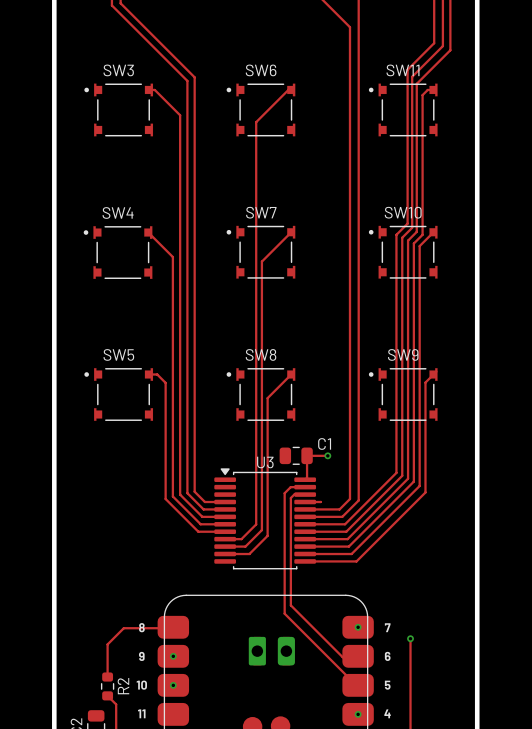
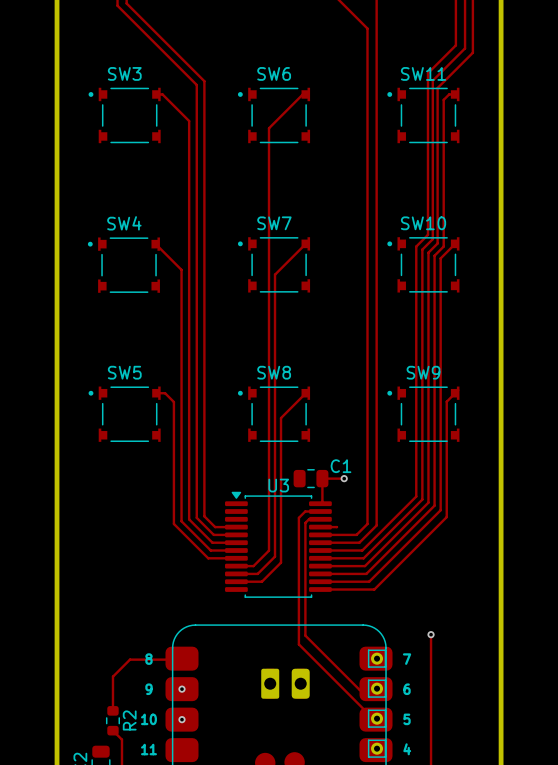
track: none -> (431, 634) (431, 670)
via: none -> (431, 634)
via: (358, 627) -> none
part: none -> (377, 658)
via: (410, 638) -> none
part: none -> (377, 688)
part: none -> (377, 718)
part: none -> (377, 748)
via: (358, 714) -> none

